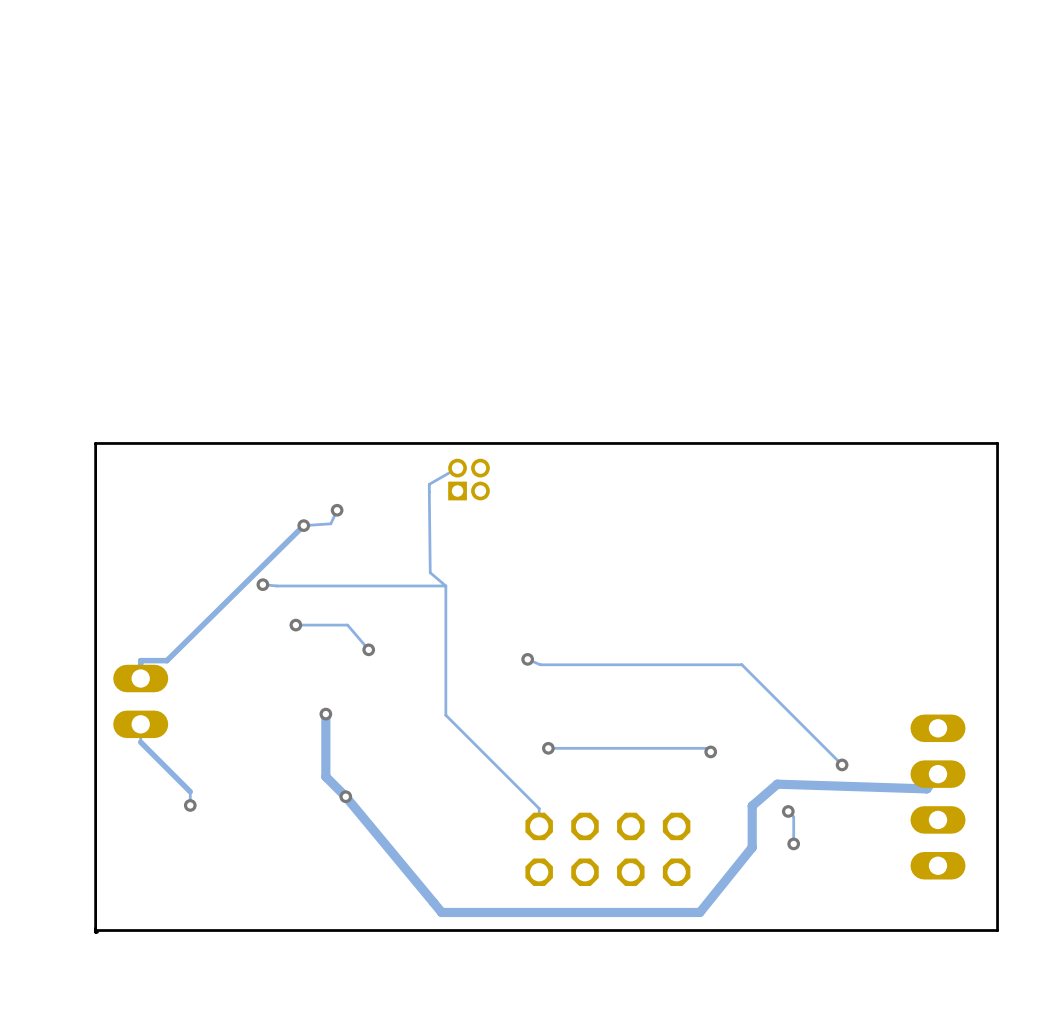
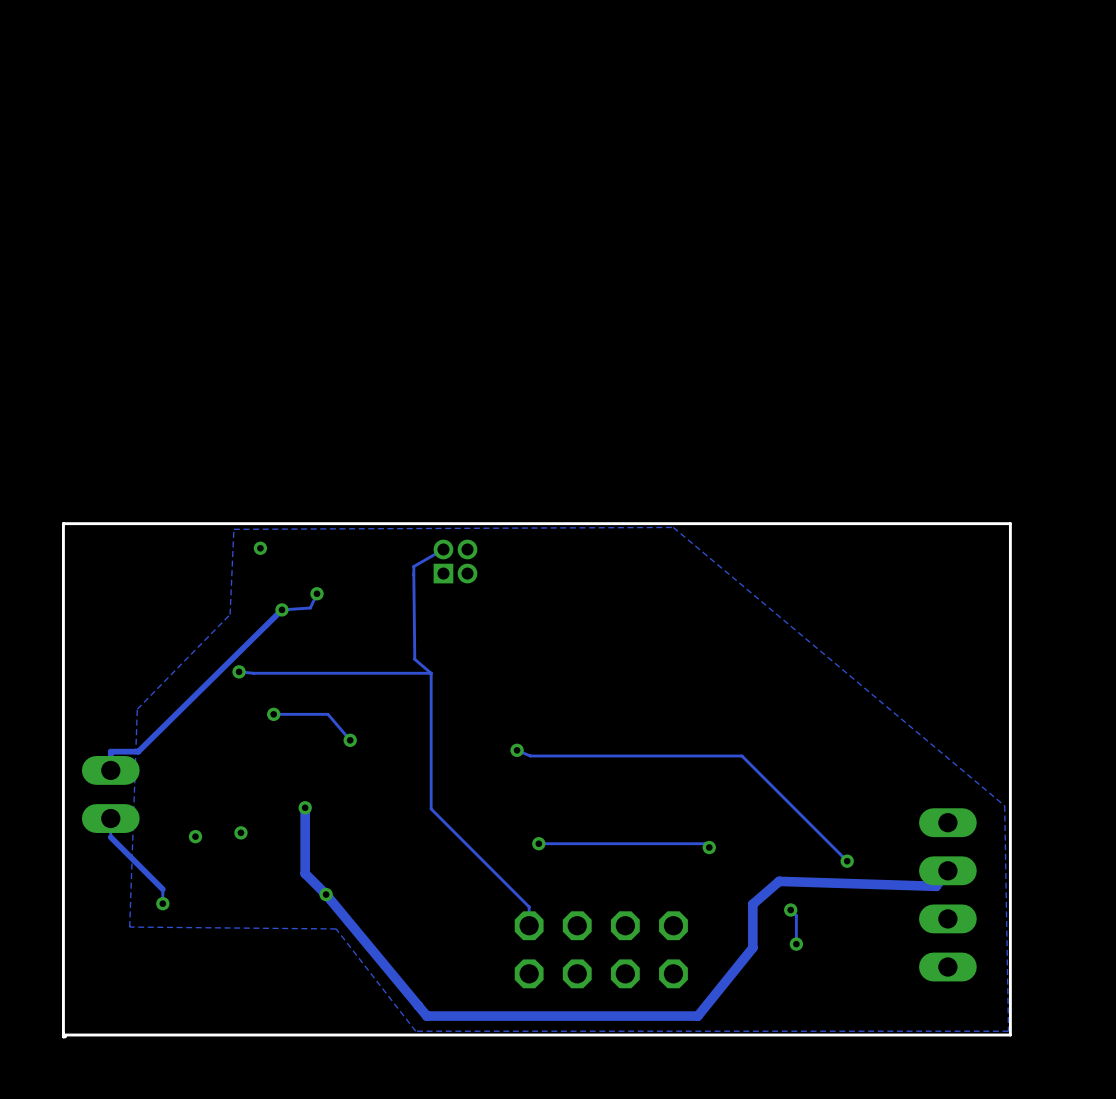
zone outline: none -> (673, 527) (233, 529) (230, 614) (137, 709) (129, 927) (336, 928) (415, 1031) (1008, 1031) (1004, 805) (673, 527)
via: none -> (260, 548)
via: none -> (240, 832)
via: none -> (195, 836)

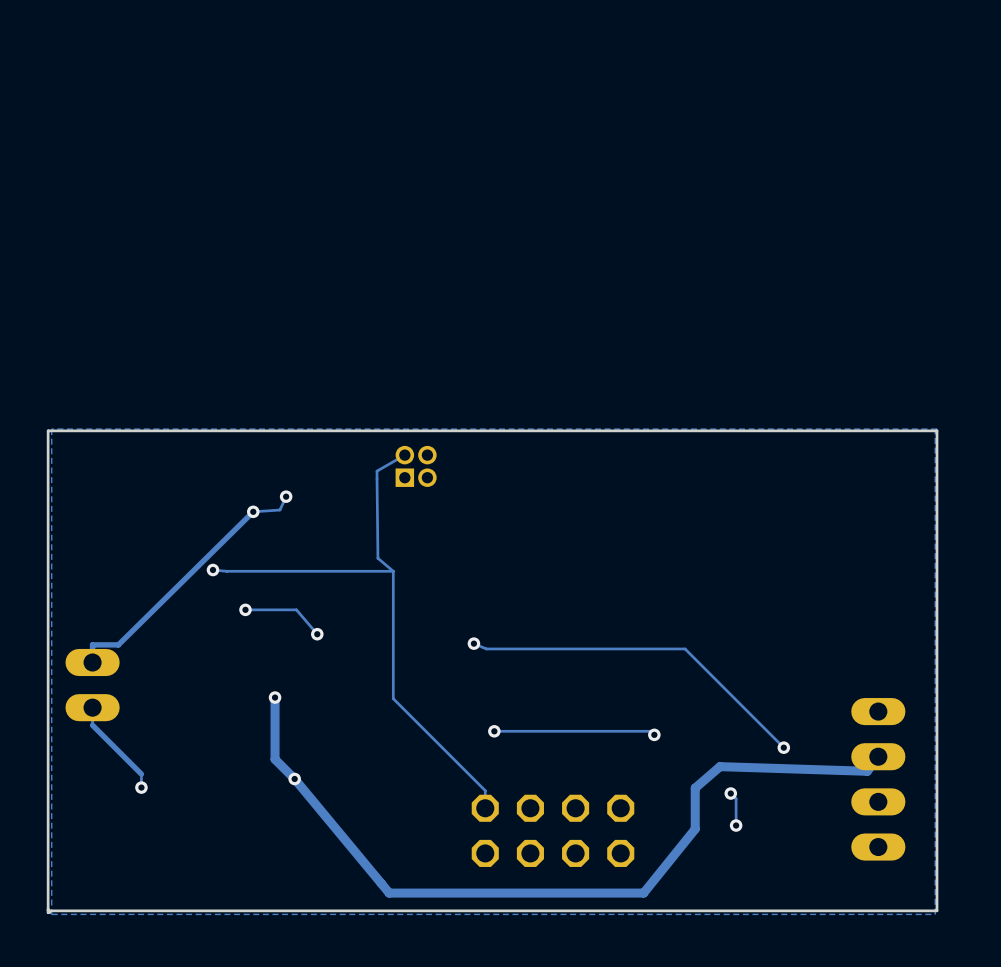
zone outline: (673, 527) (233, 529) (230, 614) (137, 709) (129, 927) (336, 928) (415, 1031) (1008, 1031) (1004, 805) (673, 527) -> (937, 429) (935, 430) (935, 914) (51, 914) (51, 429) (937, 429)
via: (260, 548) -> none
via: (240, 832) -> none
via: (195, 836) -> none

